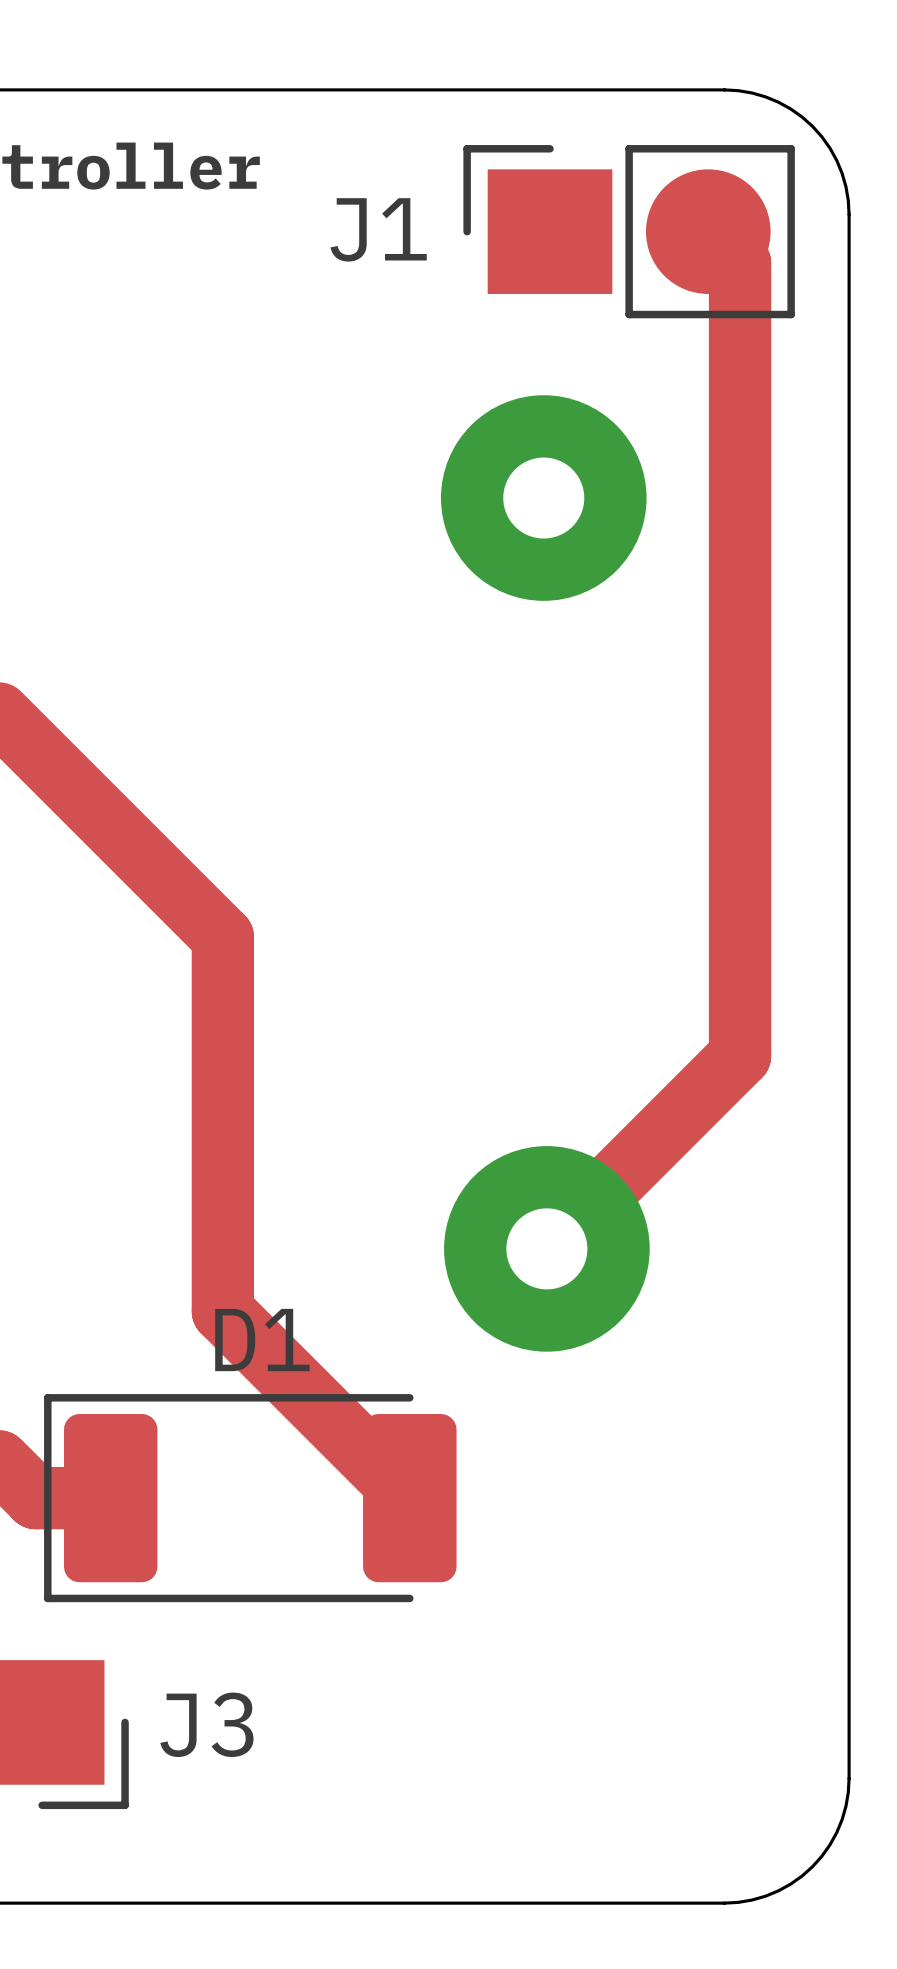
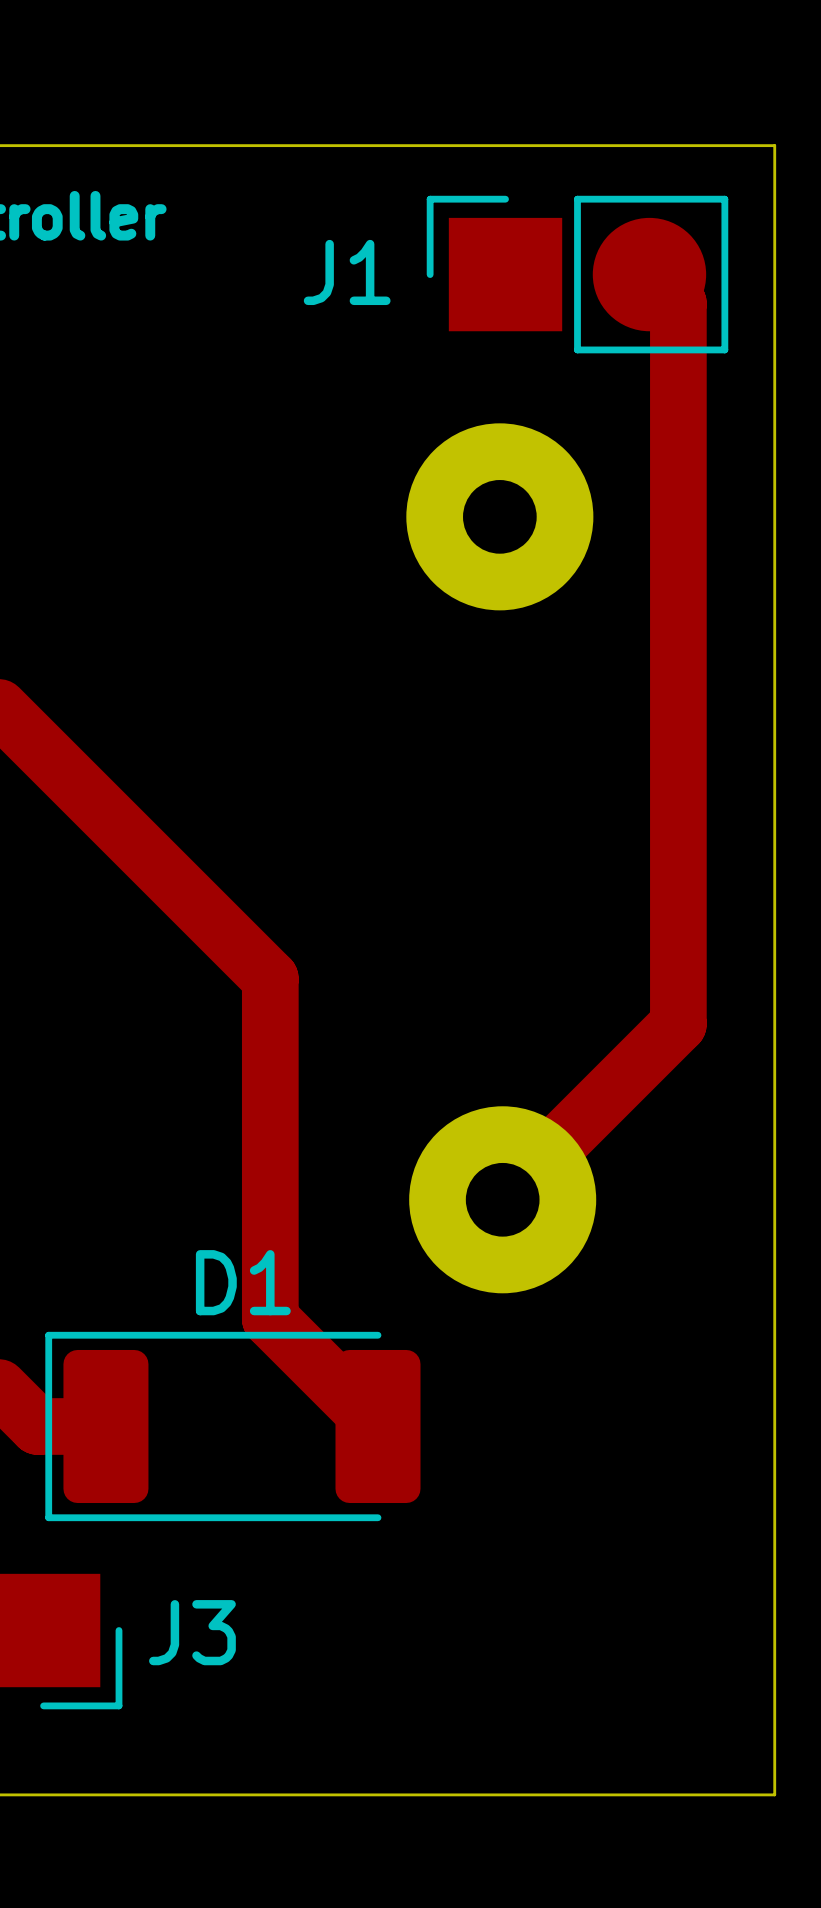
board edge: (724, 89) (752, 93) (765, 96) (790, 109) (812, 126) (829, 148) (842, 173) (848, 200) (849, 214) (848, 1792) (845, 1806) (836, 1832) (821, 1856) (812, 1866) (790, 1884) (778, 1890) (752, 1900) (724, 1903) -> (664, 145) (774, 145) (774, 1794) (664, 1794)
track: (222, 937) (222, 1311) (291, 1379) -> (207, 916) (270, 978) (270, 1318)

